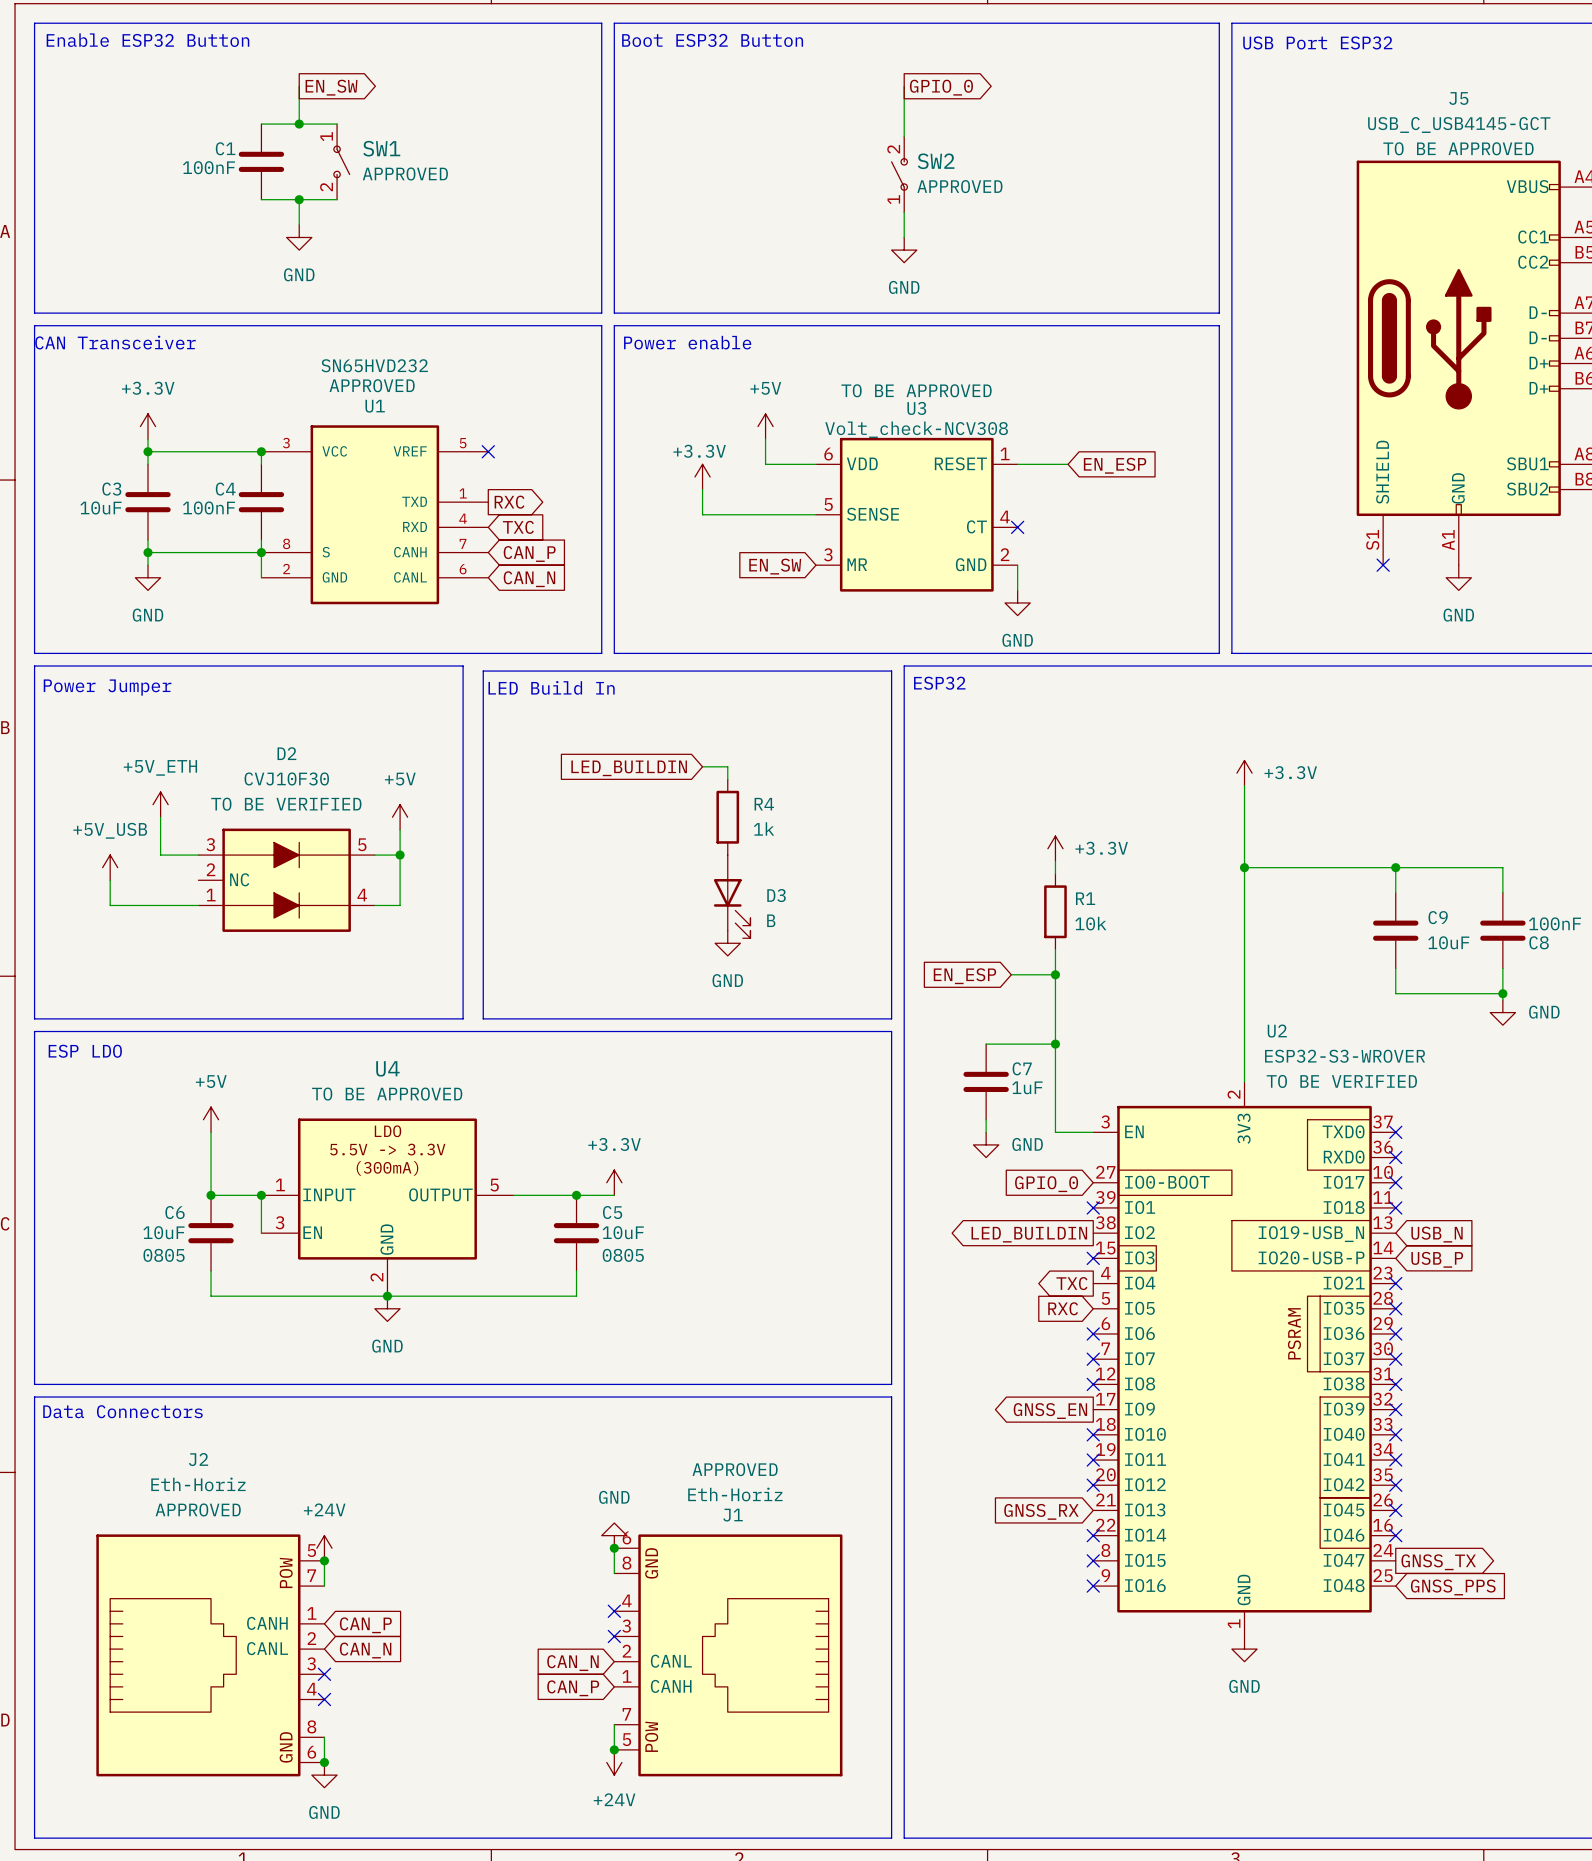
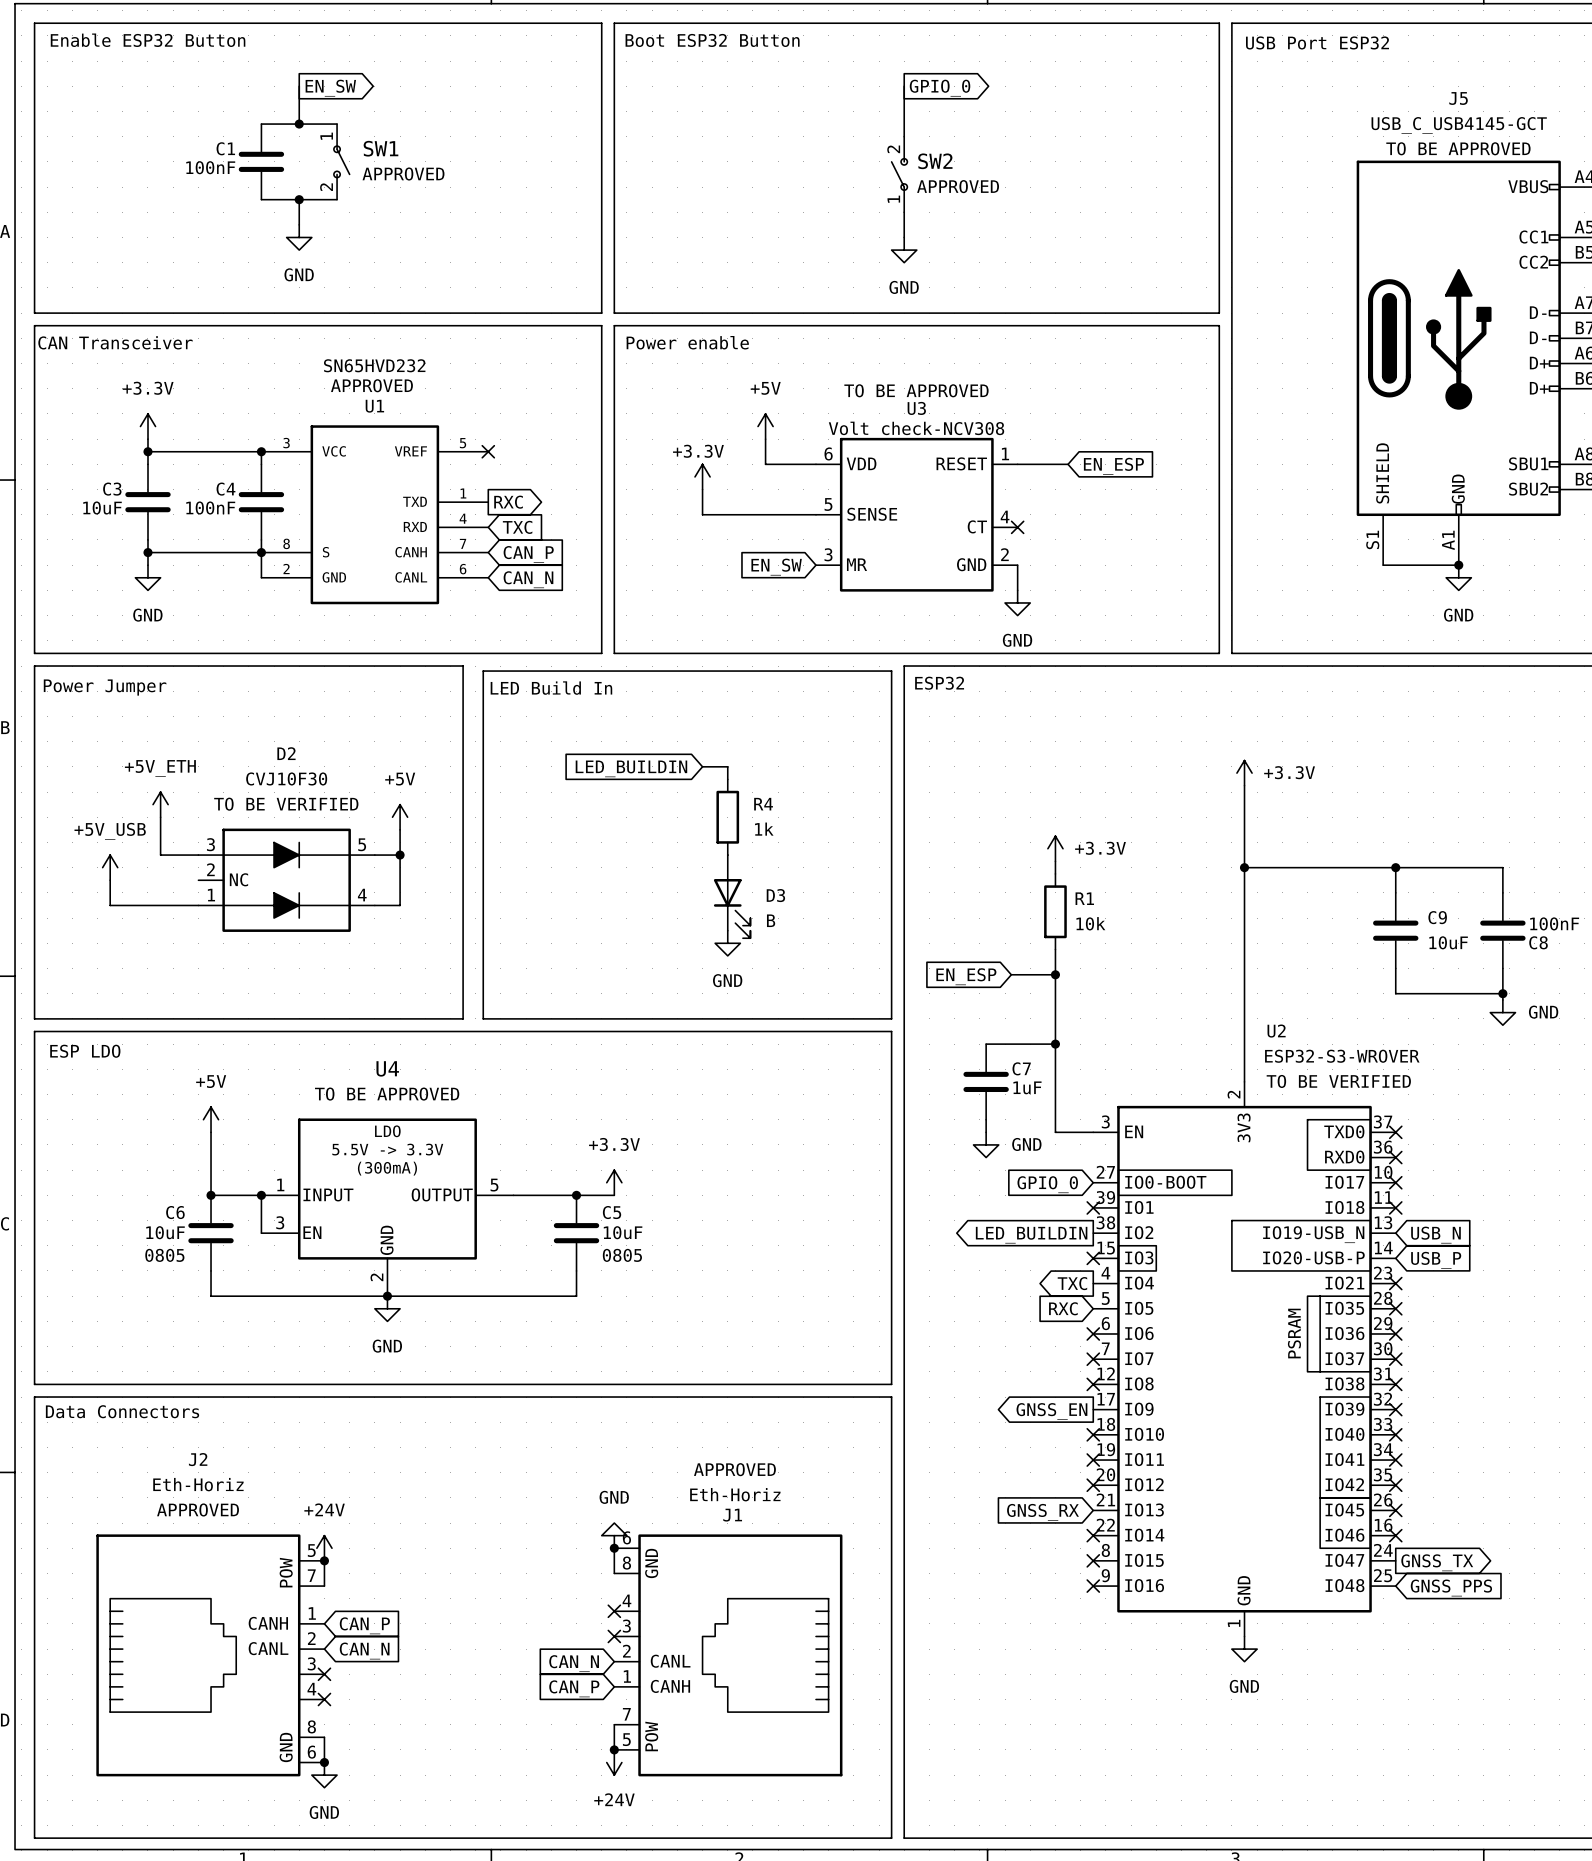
wire: none -> (1383, 565) (1458, 565)
no-connect mark: (1383, 565) -> none
junction: none -> (1458, 565)

